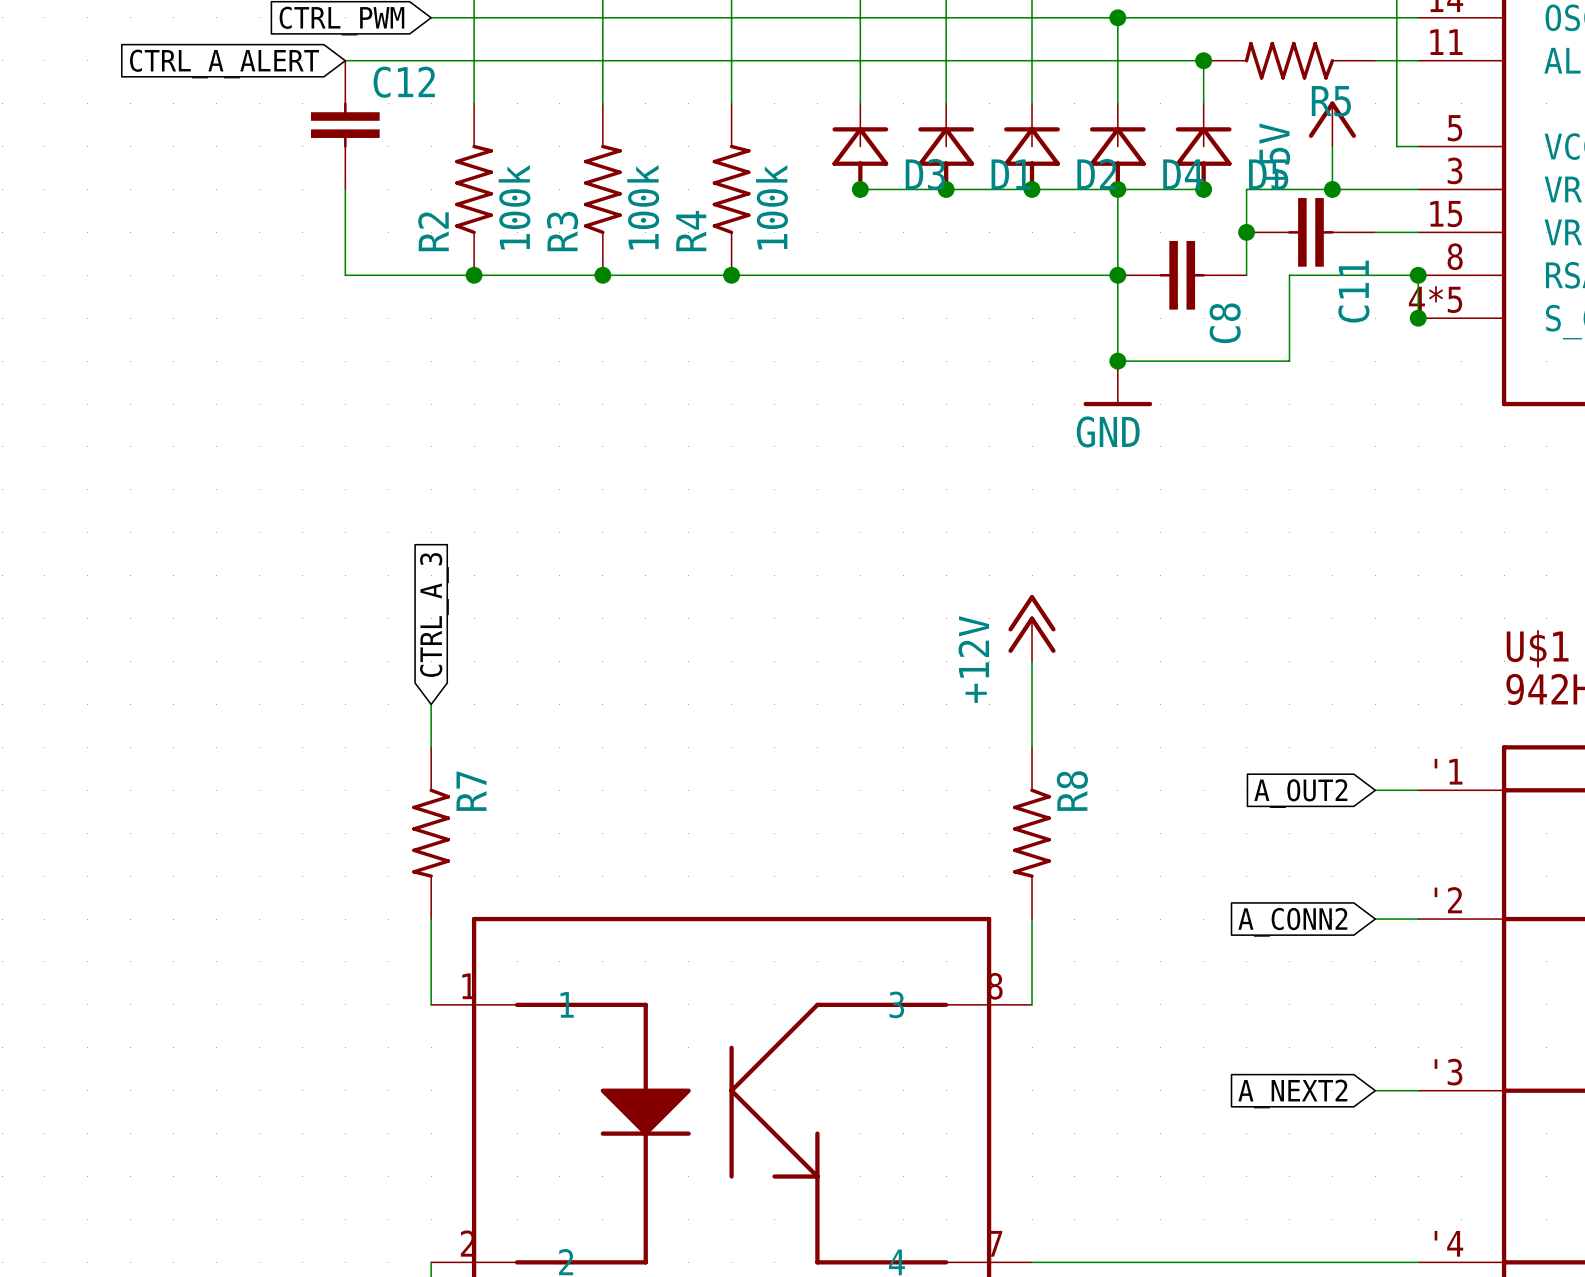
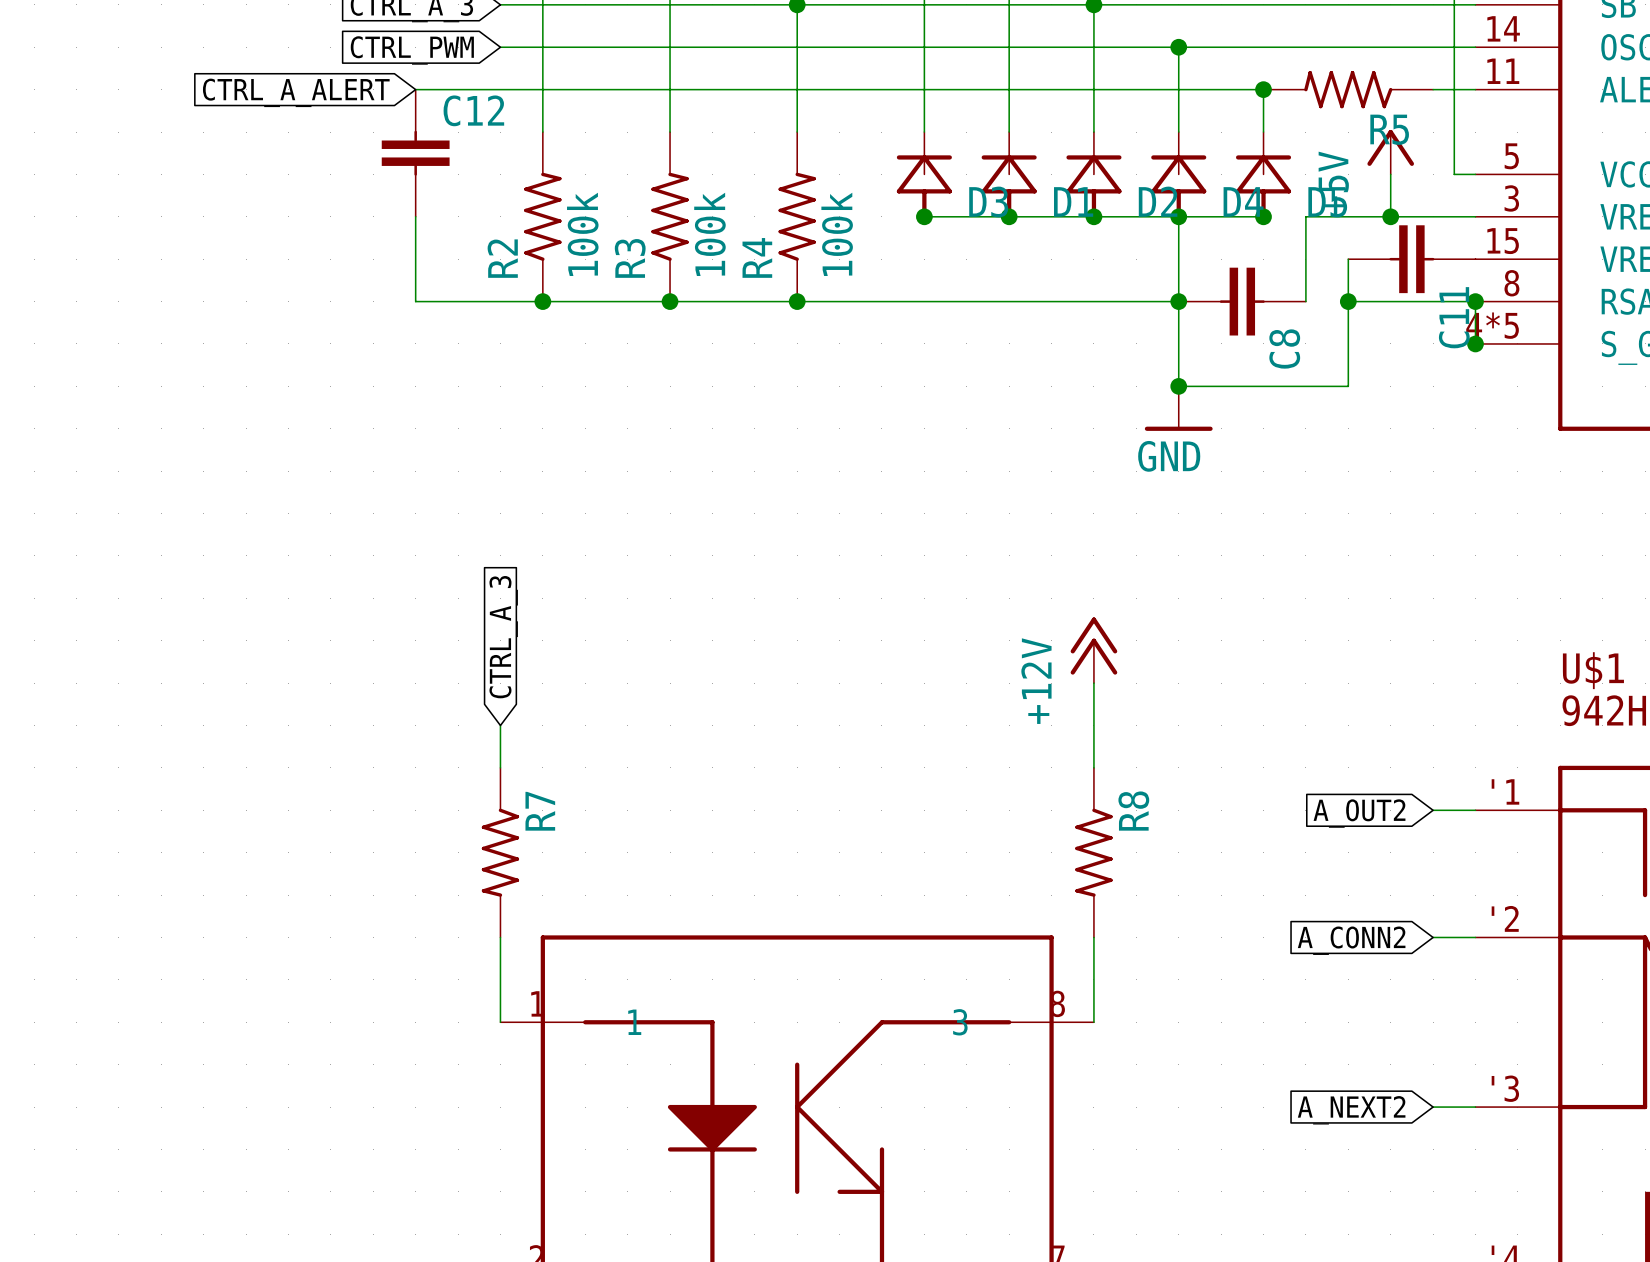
junction position: (1246, 232) -> (1348, 301)
wire: none -> (1348, 259) (1348, 301)
C11 position: (1310, 232) -> (1411, 259)

